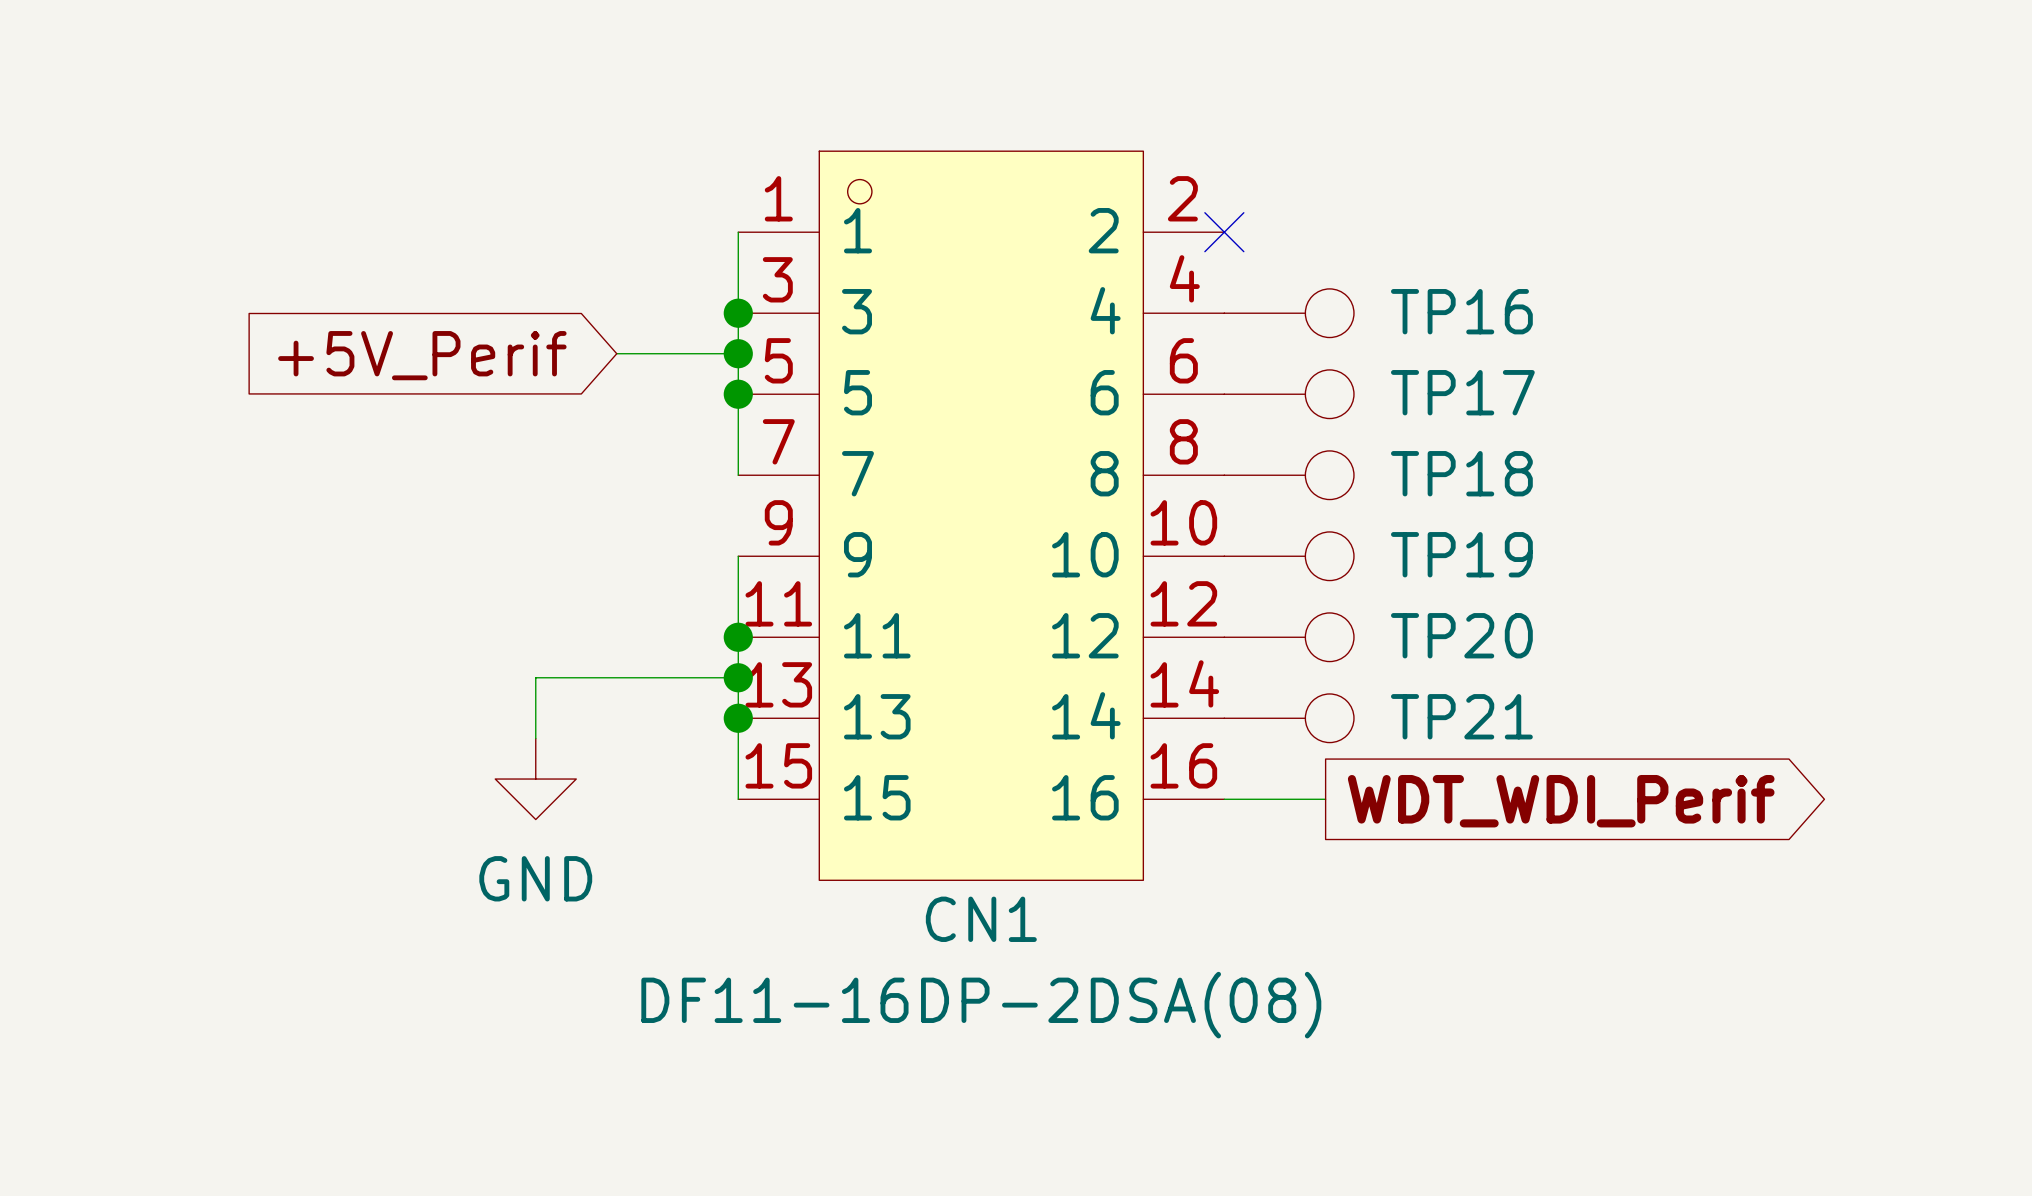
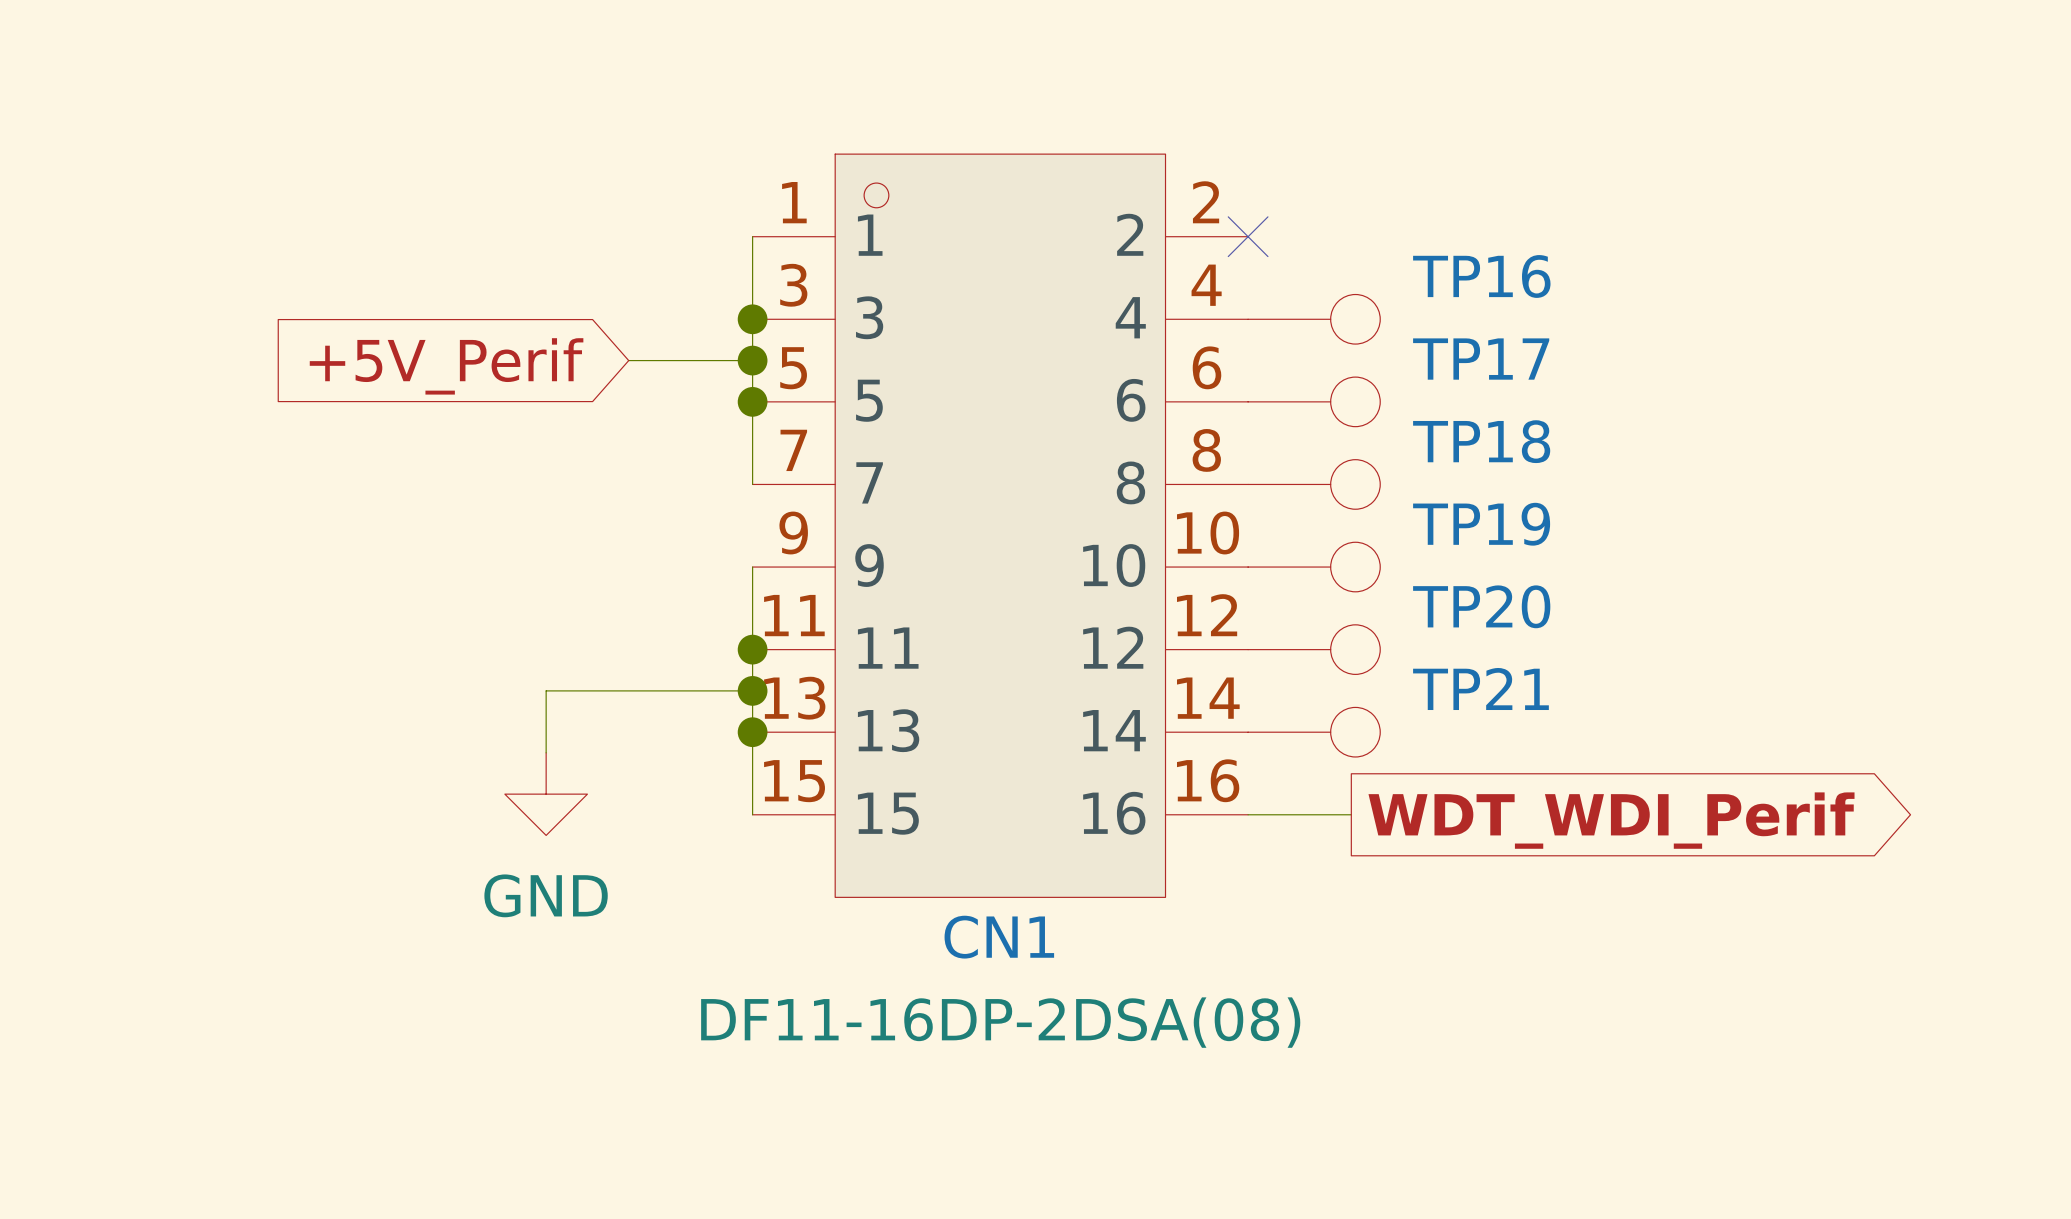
TP16 name position: TP16 (1461, 311) -> TP16 (1481, 276)
TP17 name position: TP17 (1462, 392) -> TP17 (1481, 359)
TP18 name position: TP18 (1461, 473) -> TP18 (1481, 441)
TP19 name position: TP19 (1461, 554) -> TP19 (1481, 524)
TP20 name position: TP20 (1461, 635) -> TP20 (1481, 606)
TP21 name position: TP21 (1461, 716) -> TP21 (1480, 688)

